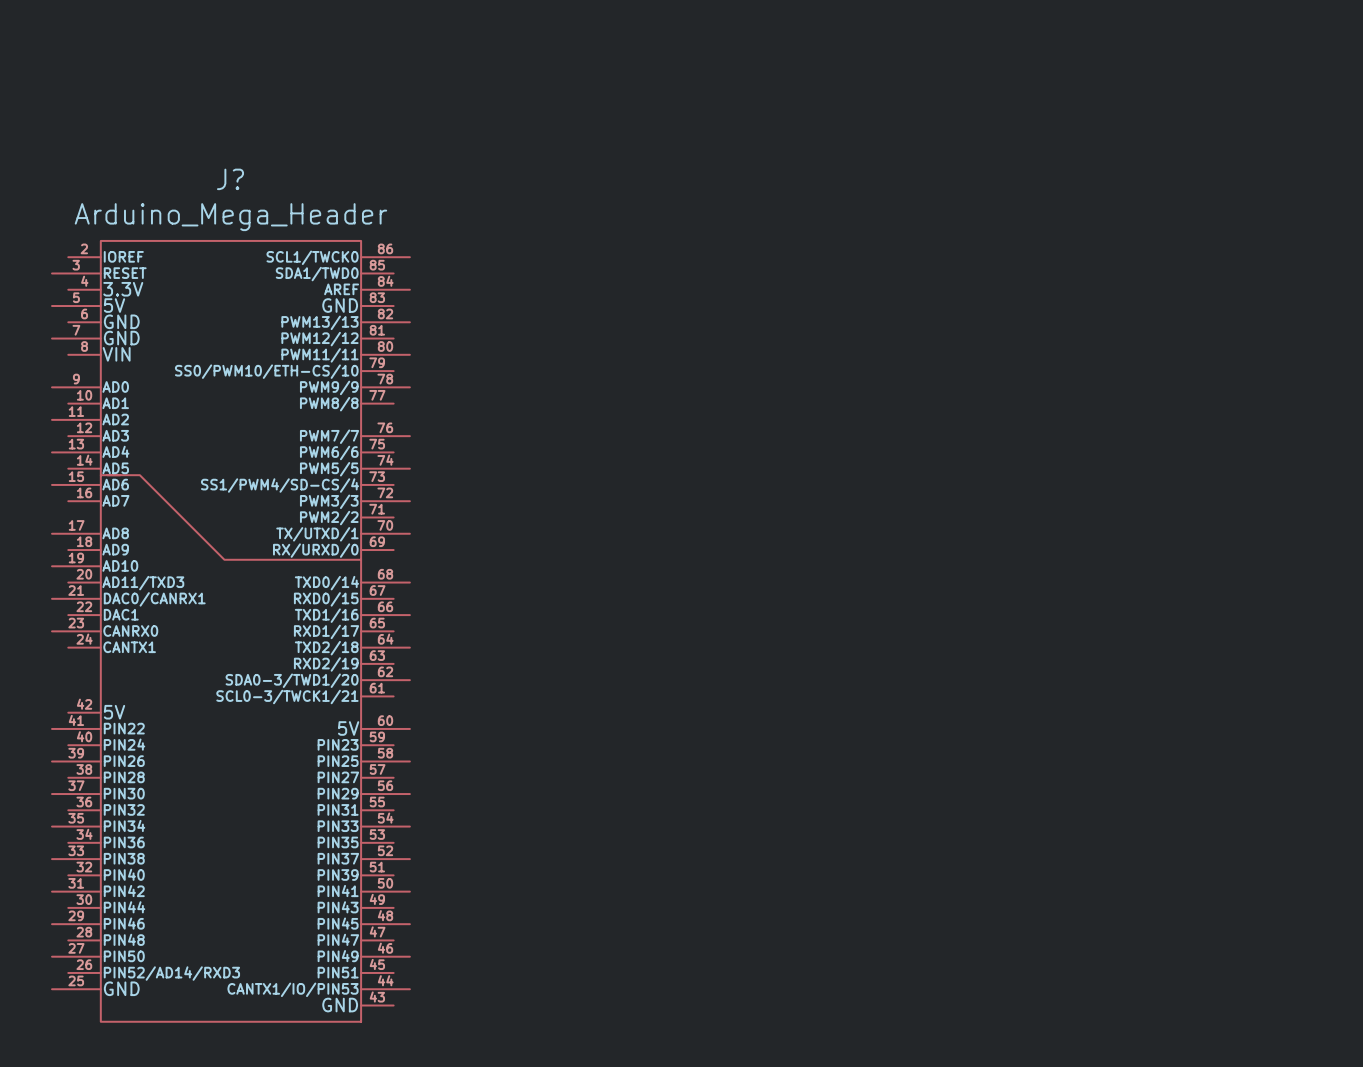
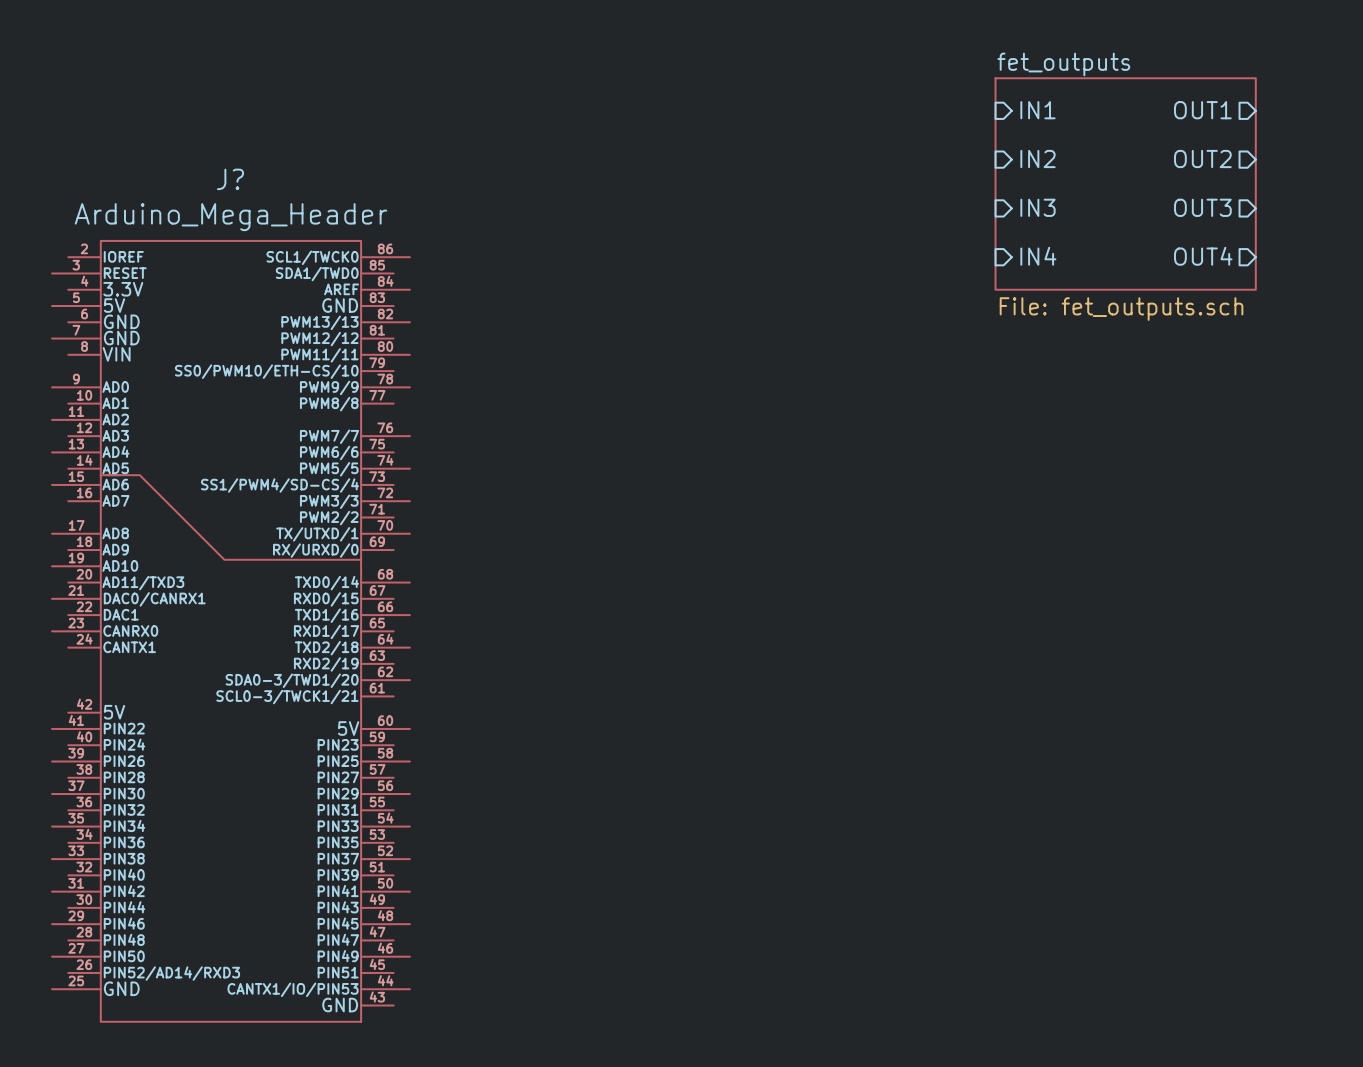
sheet pin: none -> IN1 (1037, 110)
sheet pin: none -> OUT1 (1202, 110)
sheet pin: none -> IN2 (1037, 159)
sheet pin: none -> OUT2 (1202, 159)
sheet fet_outputs: none -> File: fet_outputs.sch (1125, 184)
sheet pin: none -> IN3 (1037, 207)
sheet pin: none -> OUT3 (1202, 207)
sheet pin: none -> IN4 (1038, 256)
sheet pin: none -> OUT4 (1203, 256)

